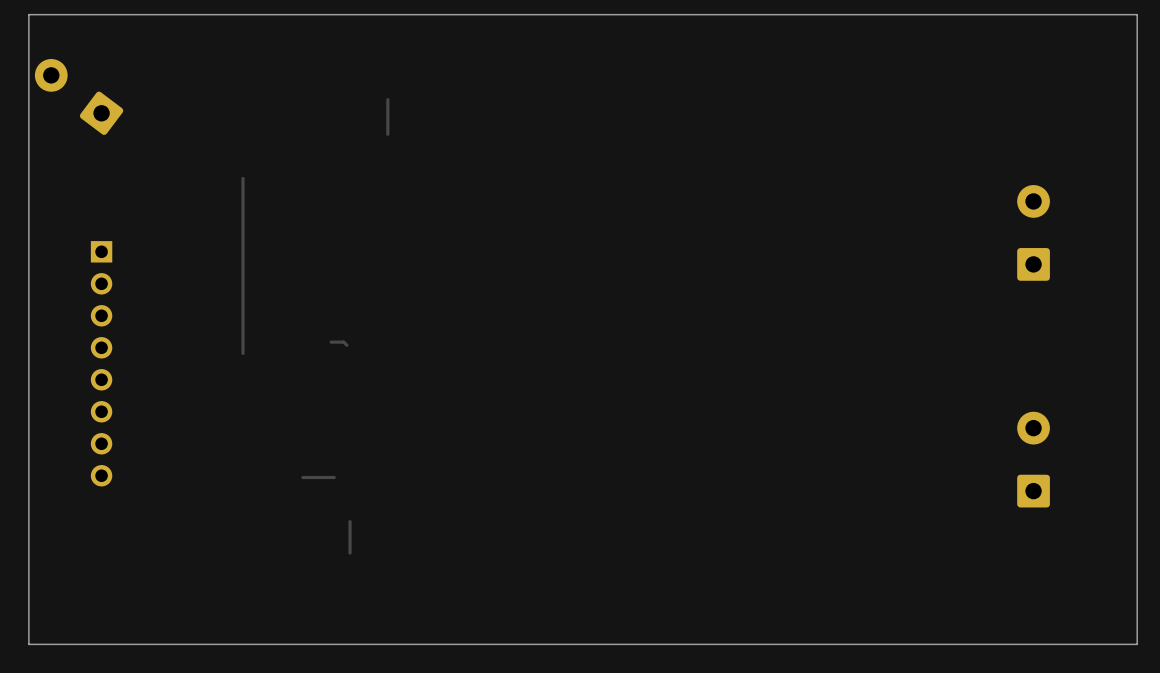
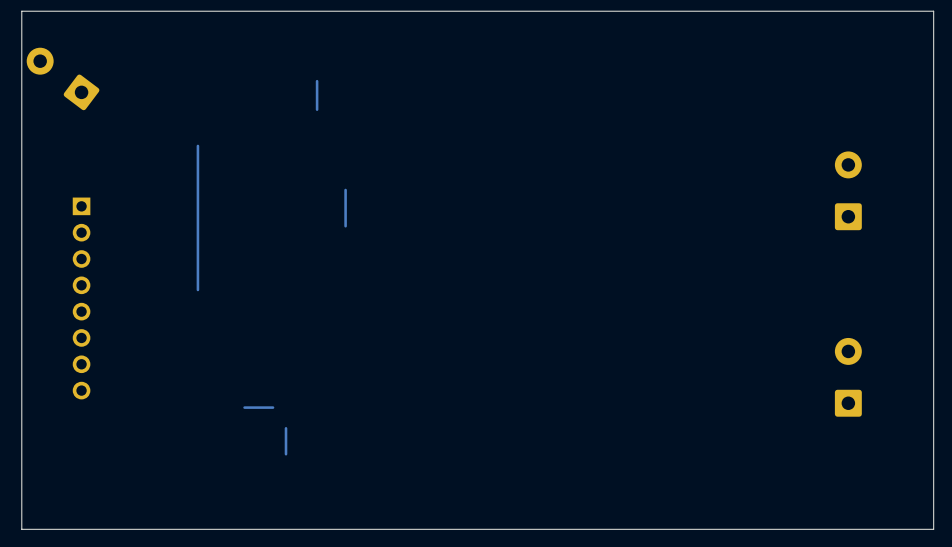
track: none -> (345, 189) (345, 226)
track: (331, 342) (343, 342) (346, 345) -> none
track: (334, 477) (302, 477) -> none
track: none -> (273, 407) (244, 407)

